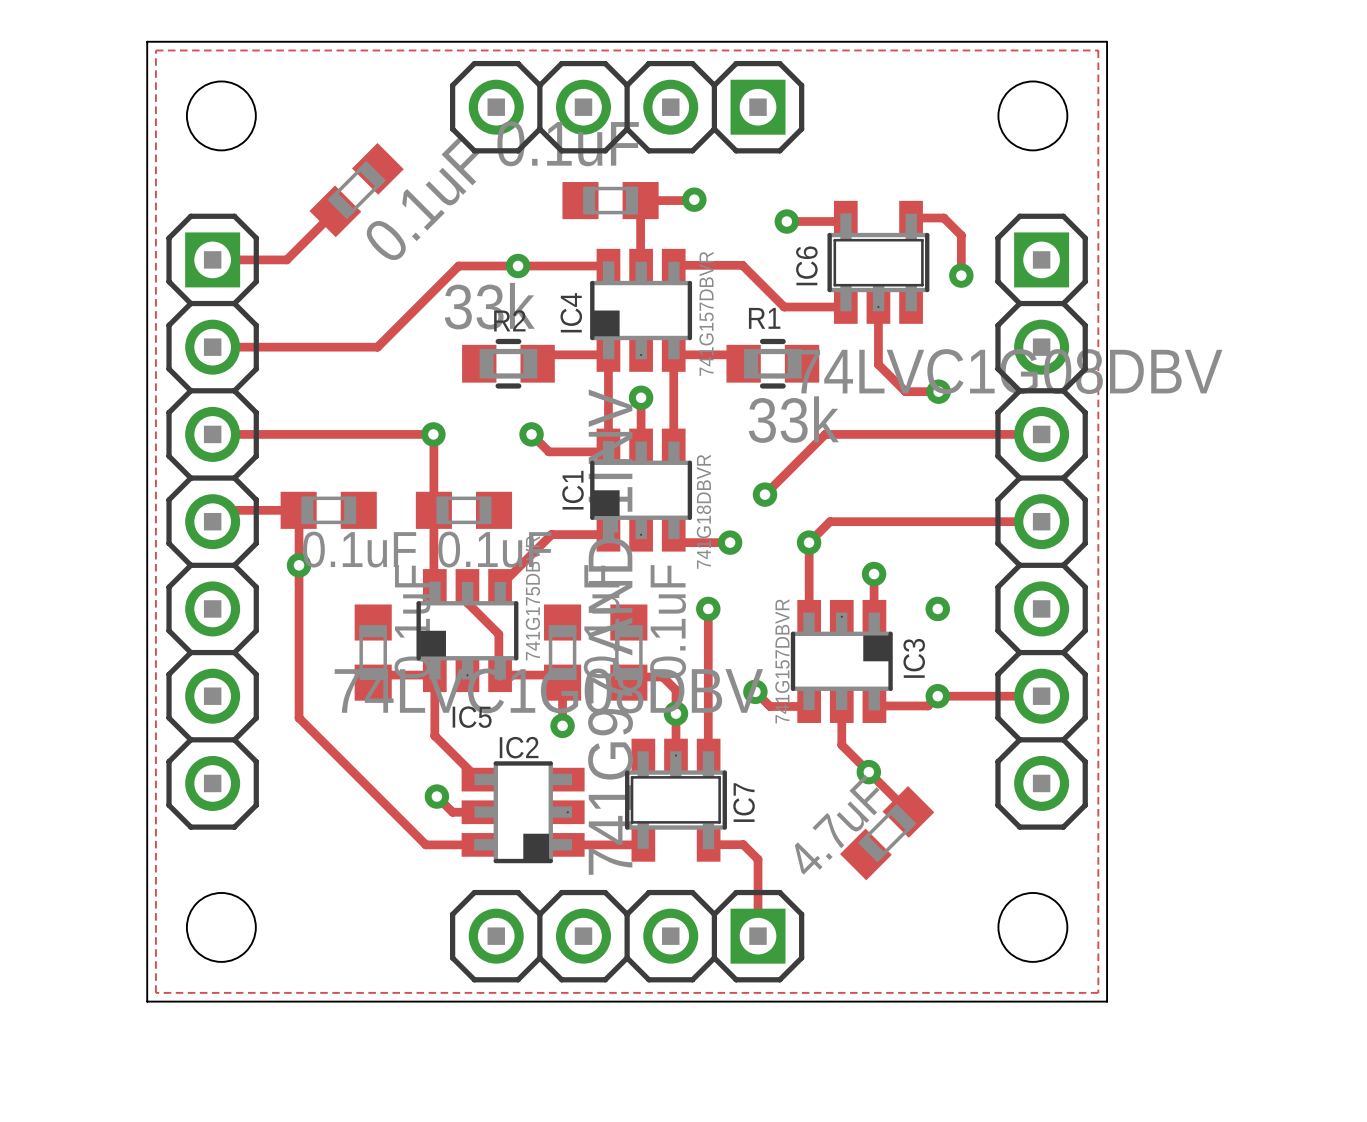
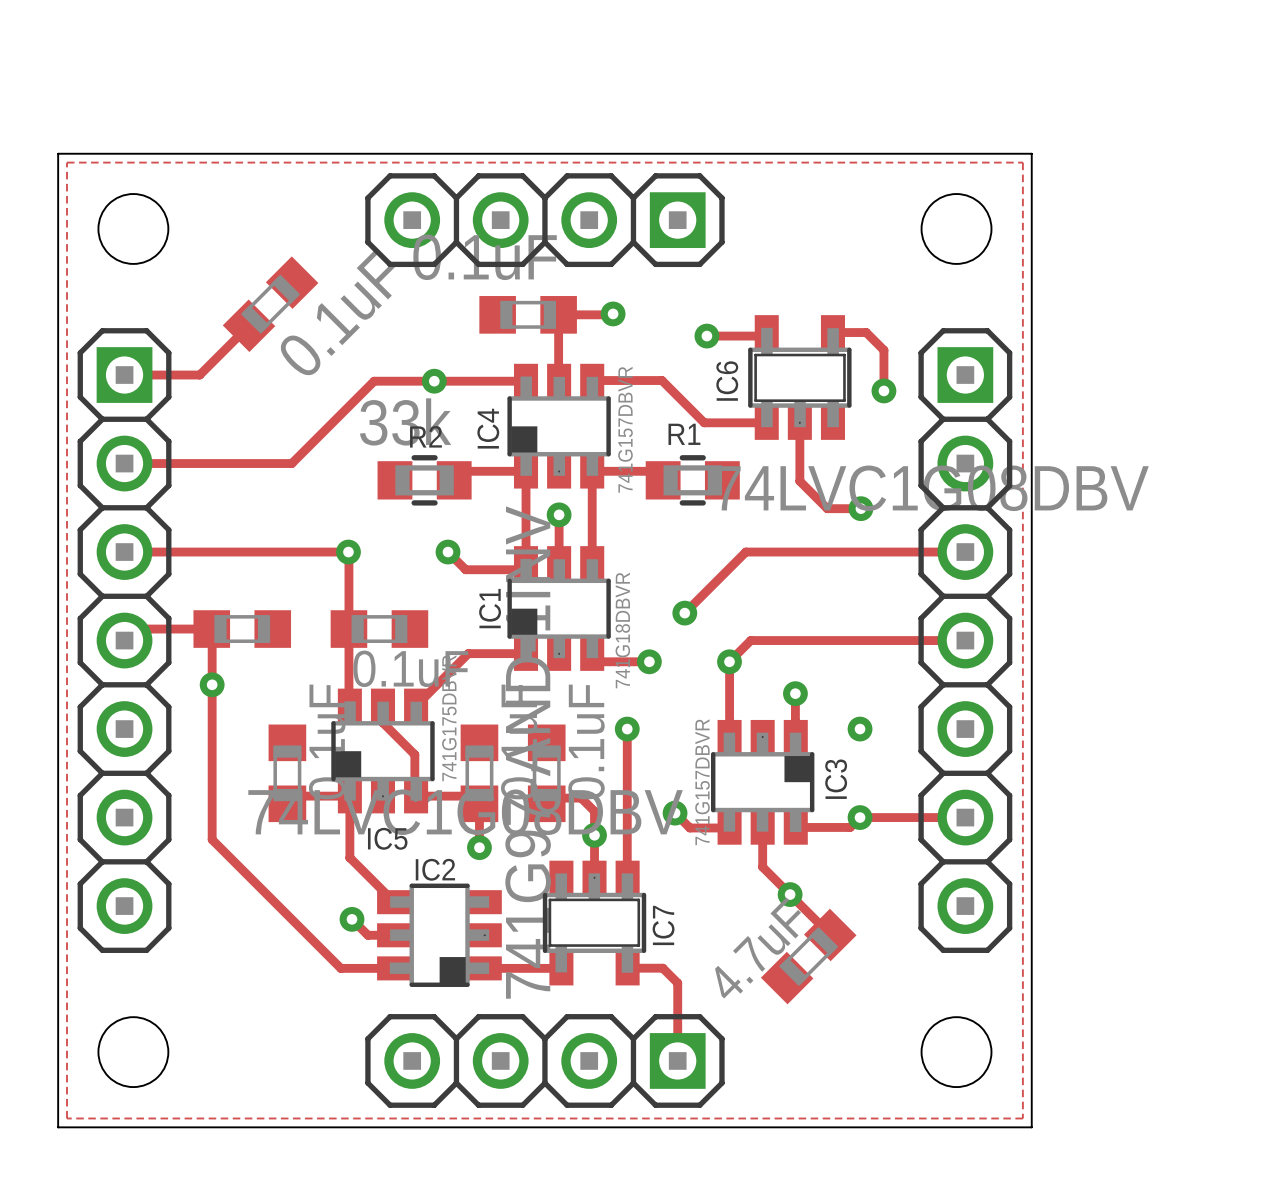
R1 value: 33k (793, 419) -> none
part value: 0.1uF (359, 549) -> none

